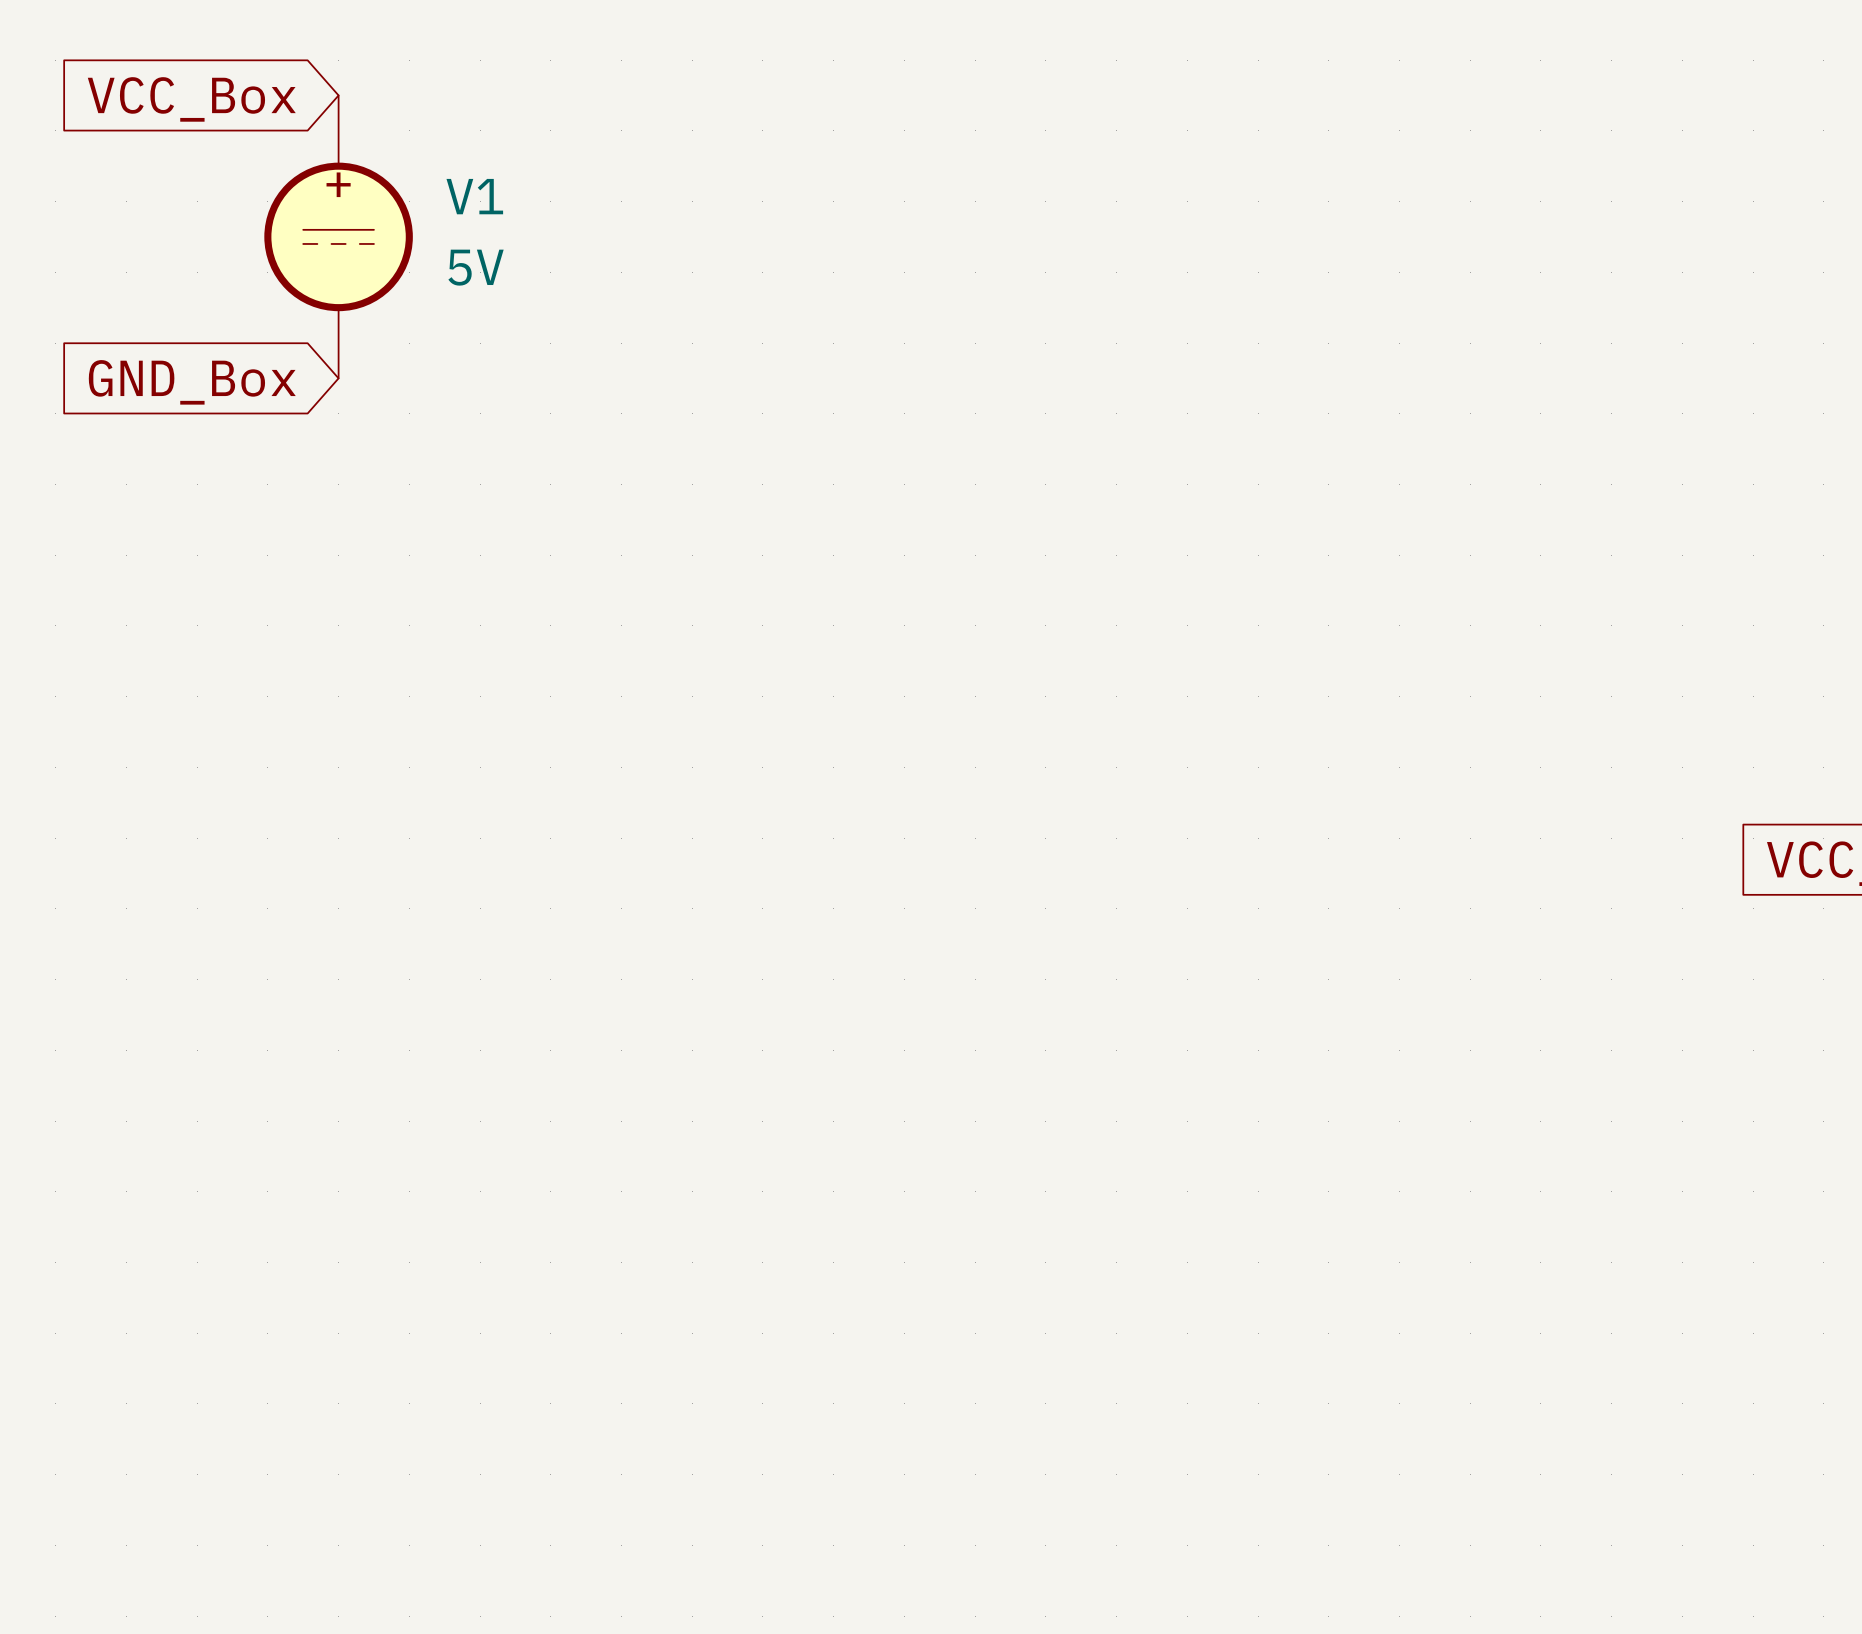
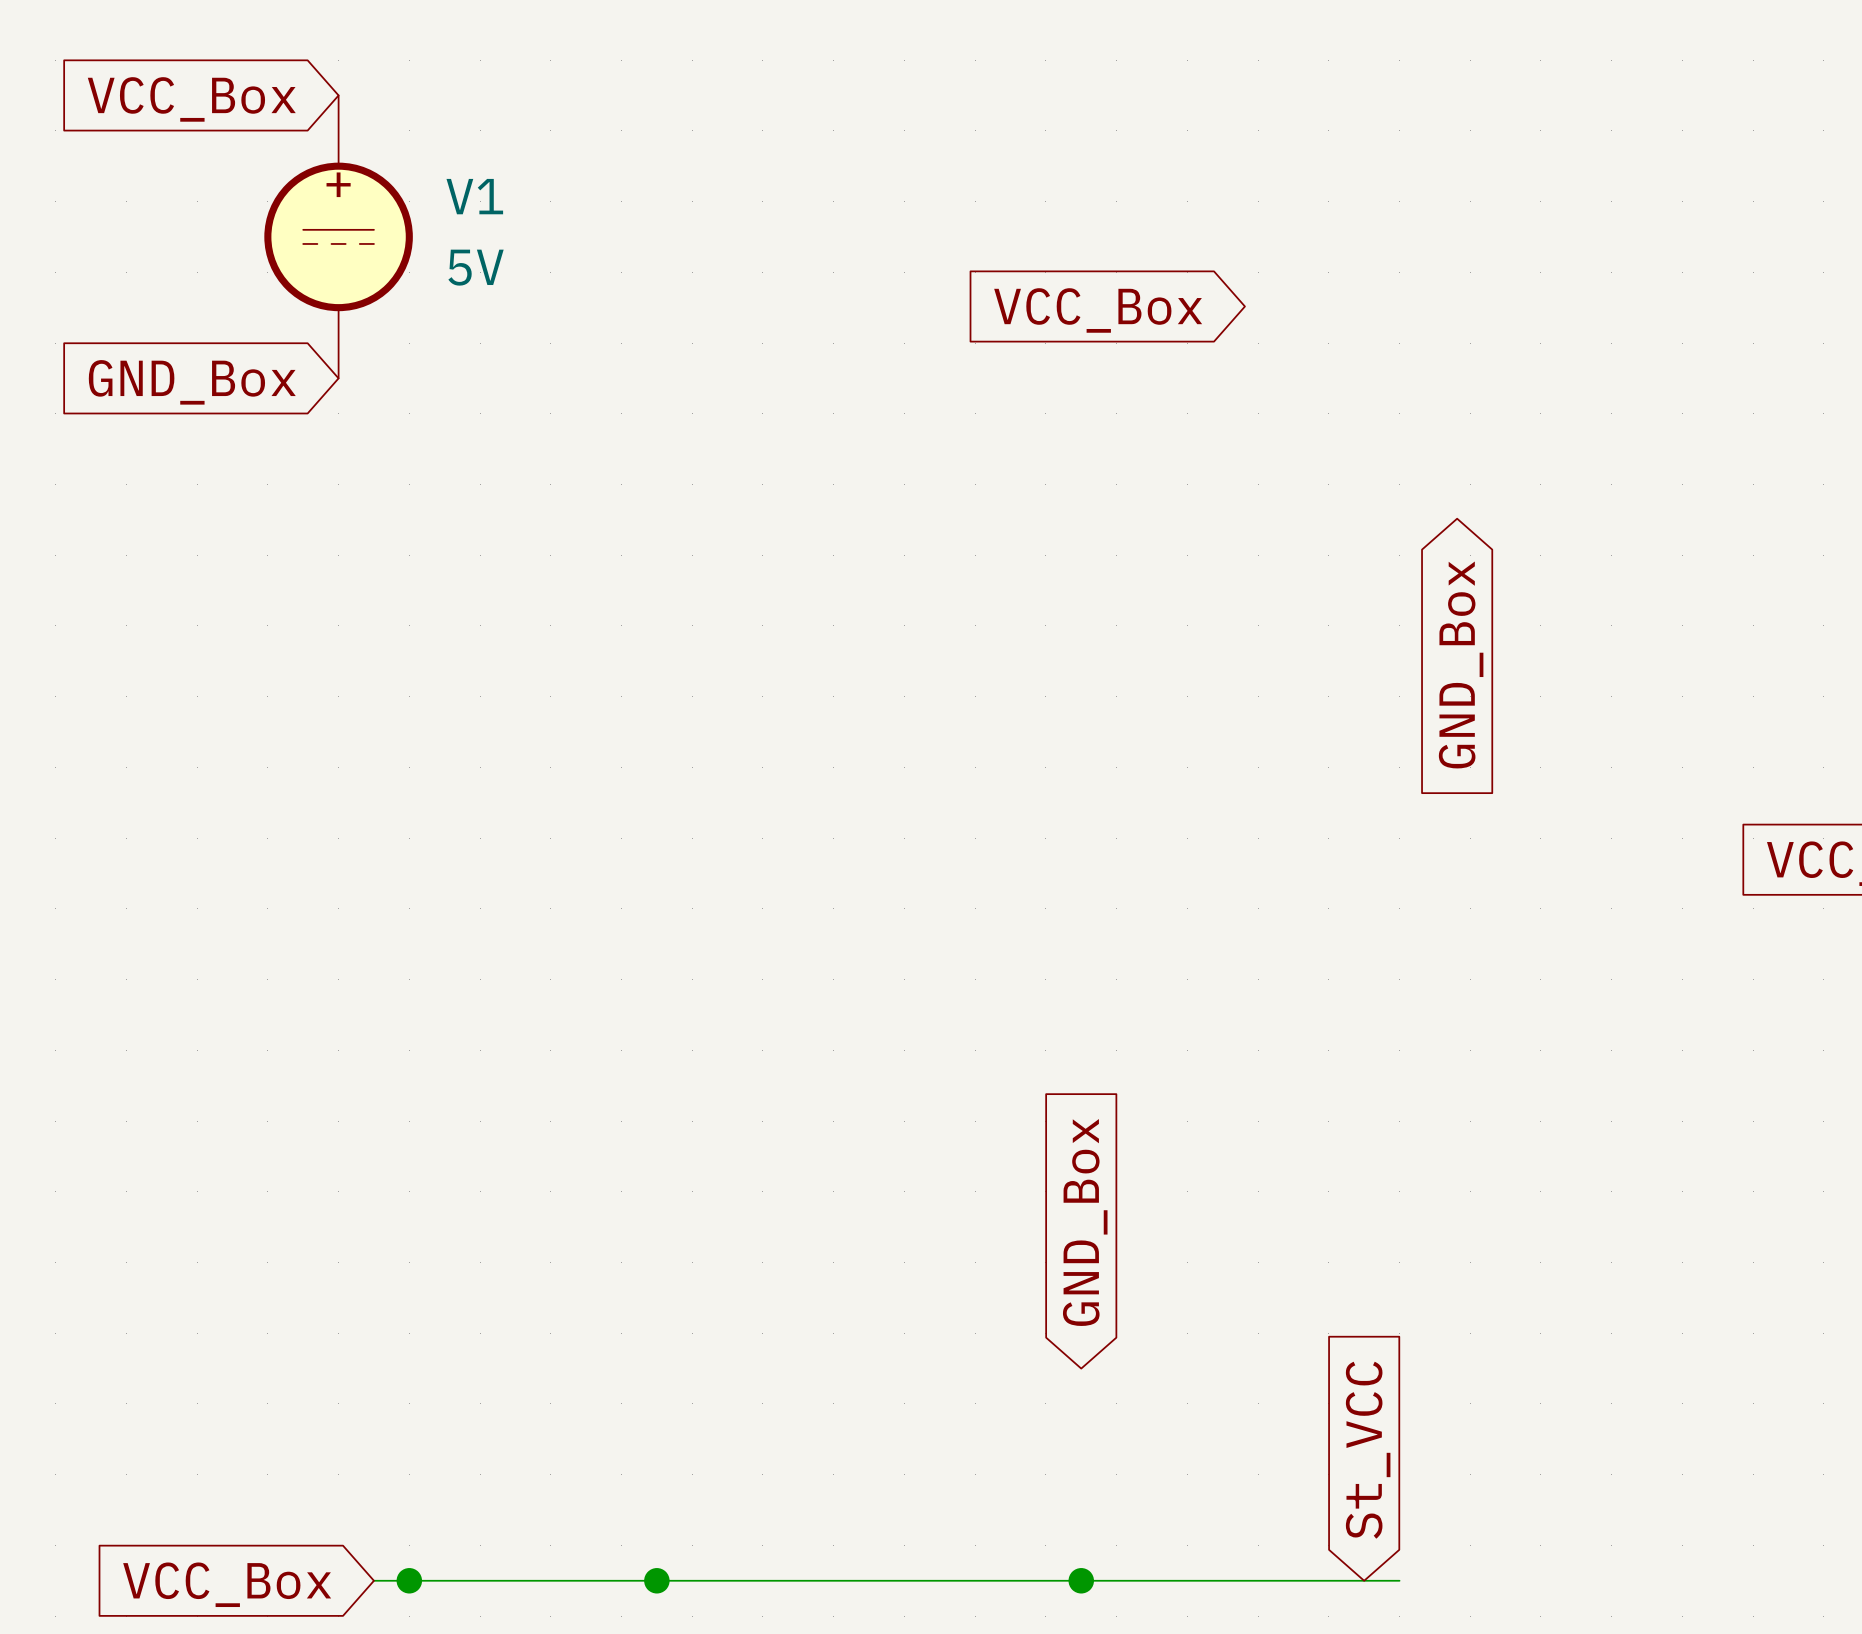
global label: none -> VCC_Box (1098, 310)
global label: none -> GND_Box (1461, 664)
global label: none -> GND_Box (1085, 1222)
global label: none -> St_VCC (1368, 1450)
wire: none -> (373, 1580) (1399, 1580)
junction: none -> (409, 1580)
junction: none -> (656, 1580)
junction: none -> (1081, 1580)
global label: none -> VCC_Box (227, 1584)

